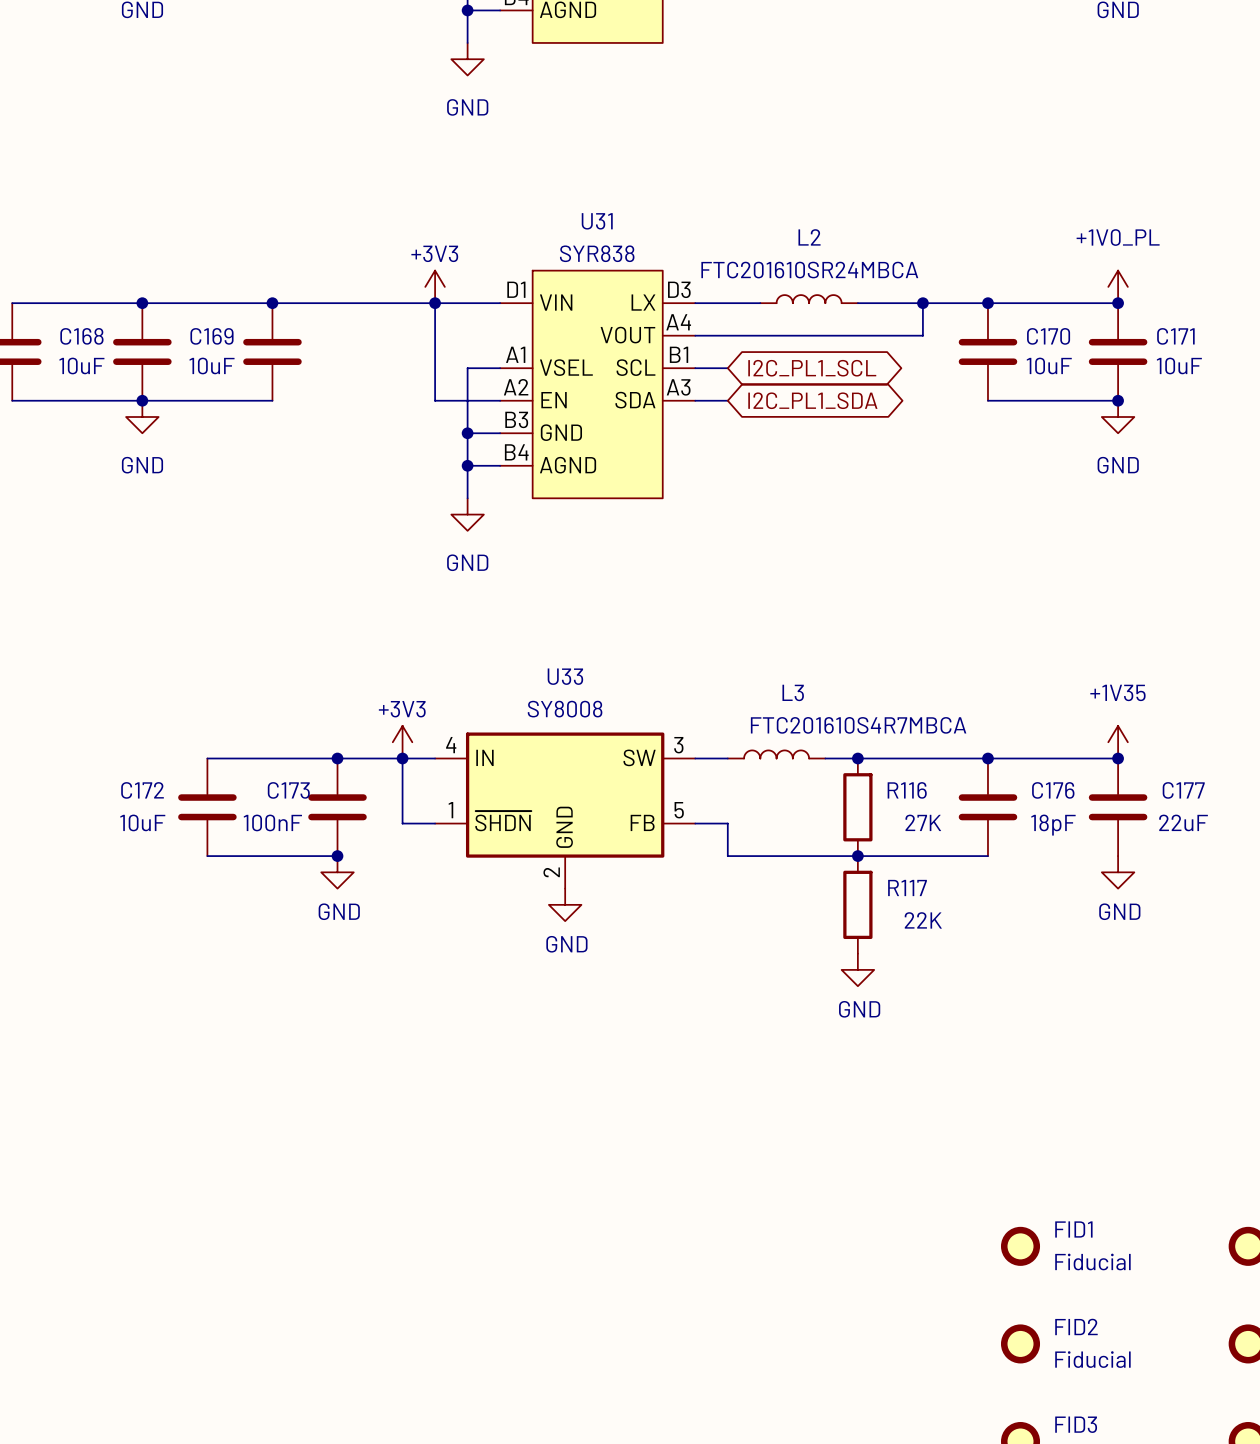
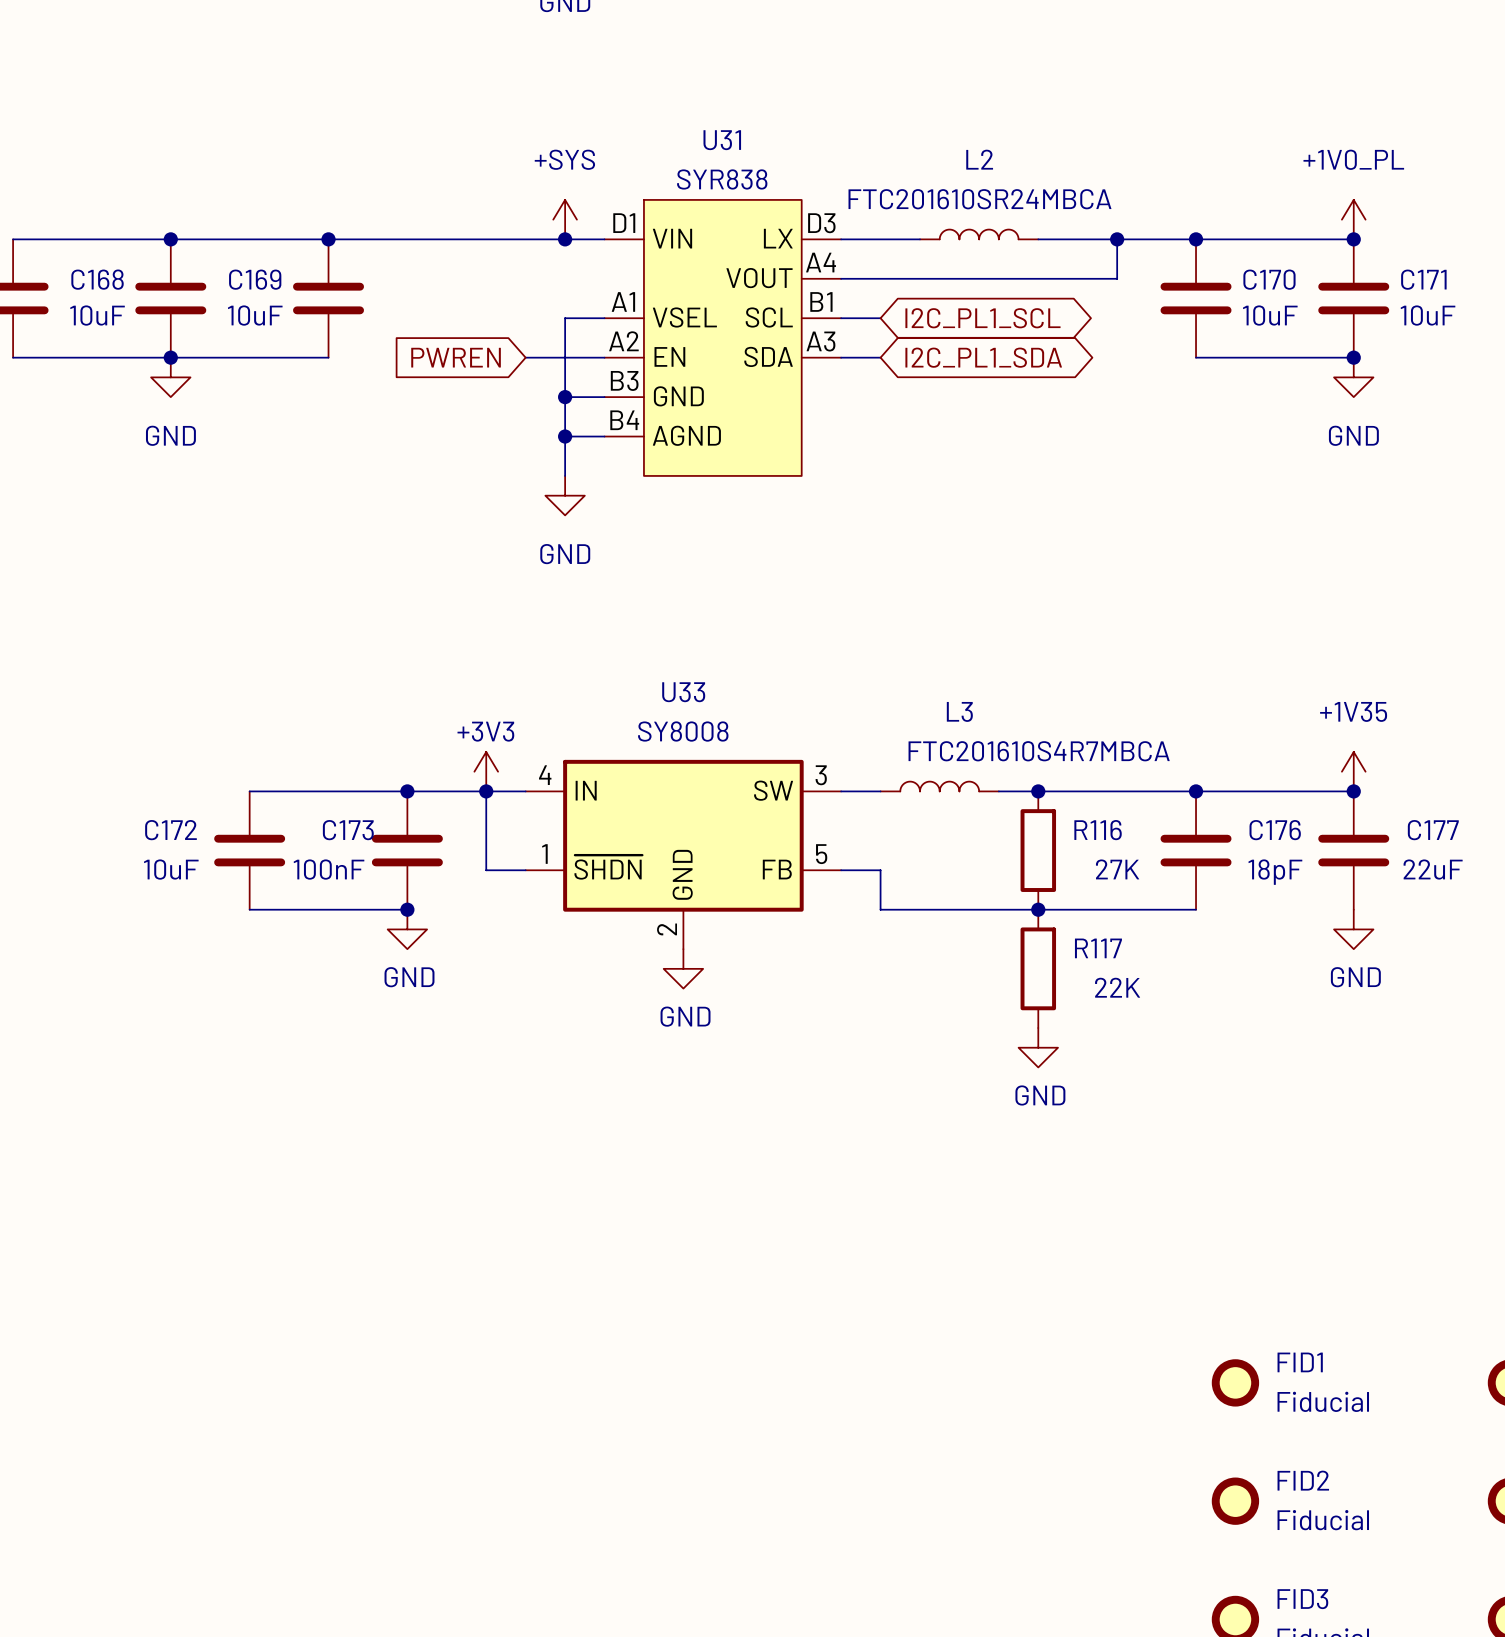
power symbol: +3V3 (435, 286) -> none
power symbol: none -> +SYS (565, 219)
wire: (435, 303) (435, 400) -> none
junction position: (435, 303) -> (565, 239)
global label: none -> PWREN (456, 357)

